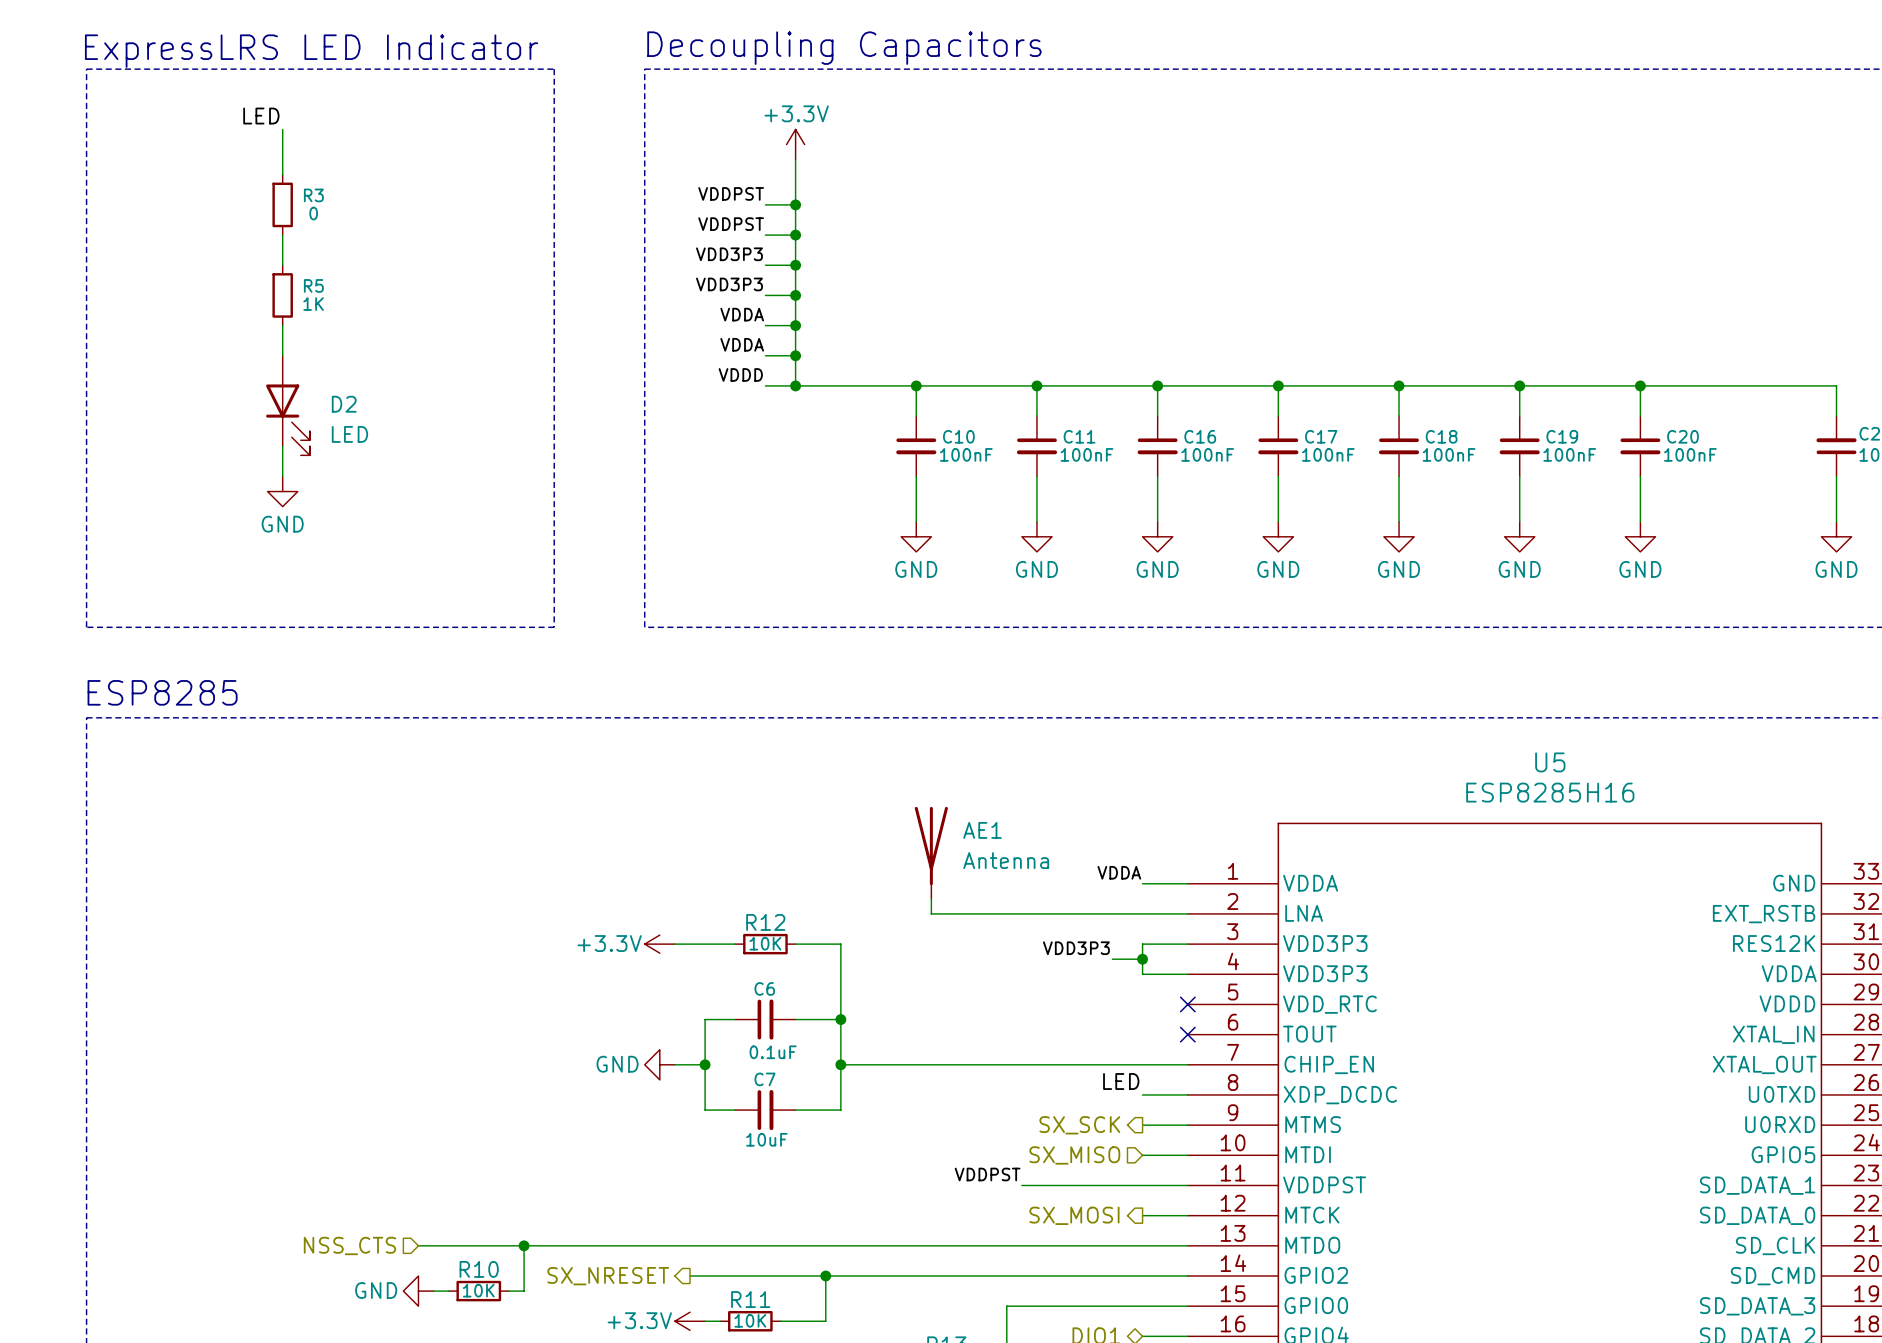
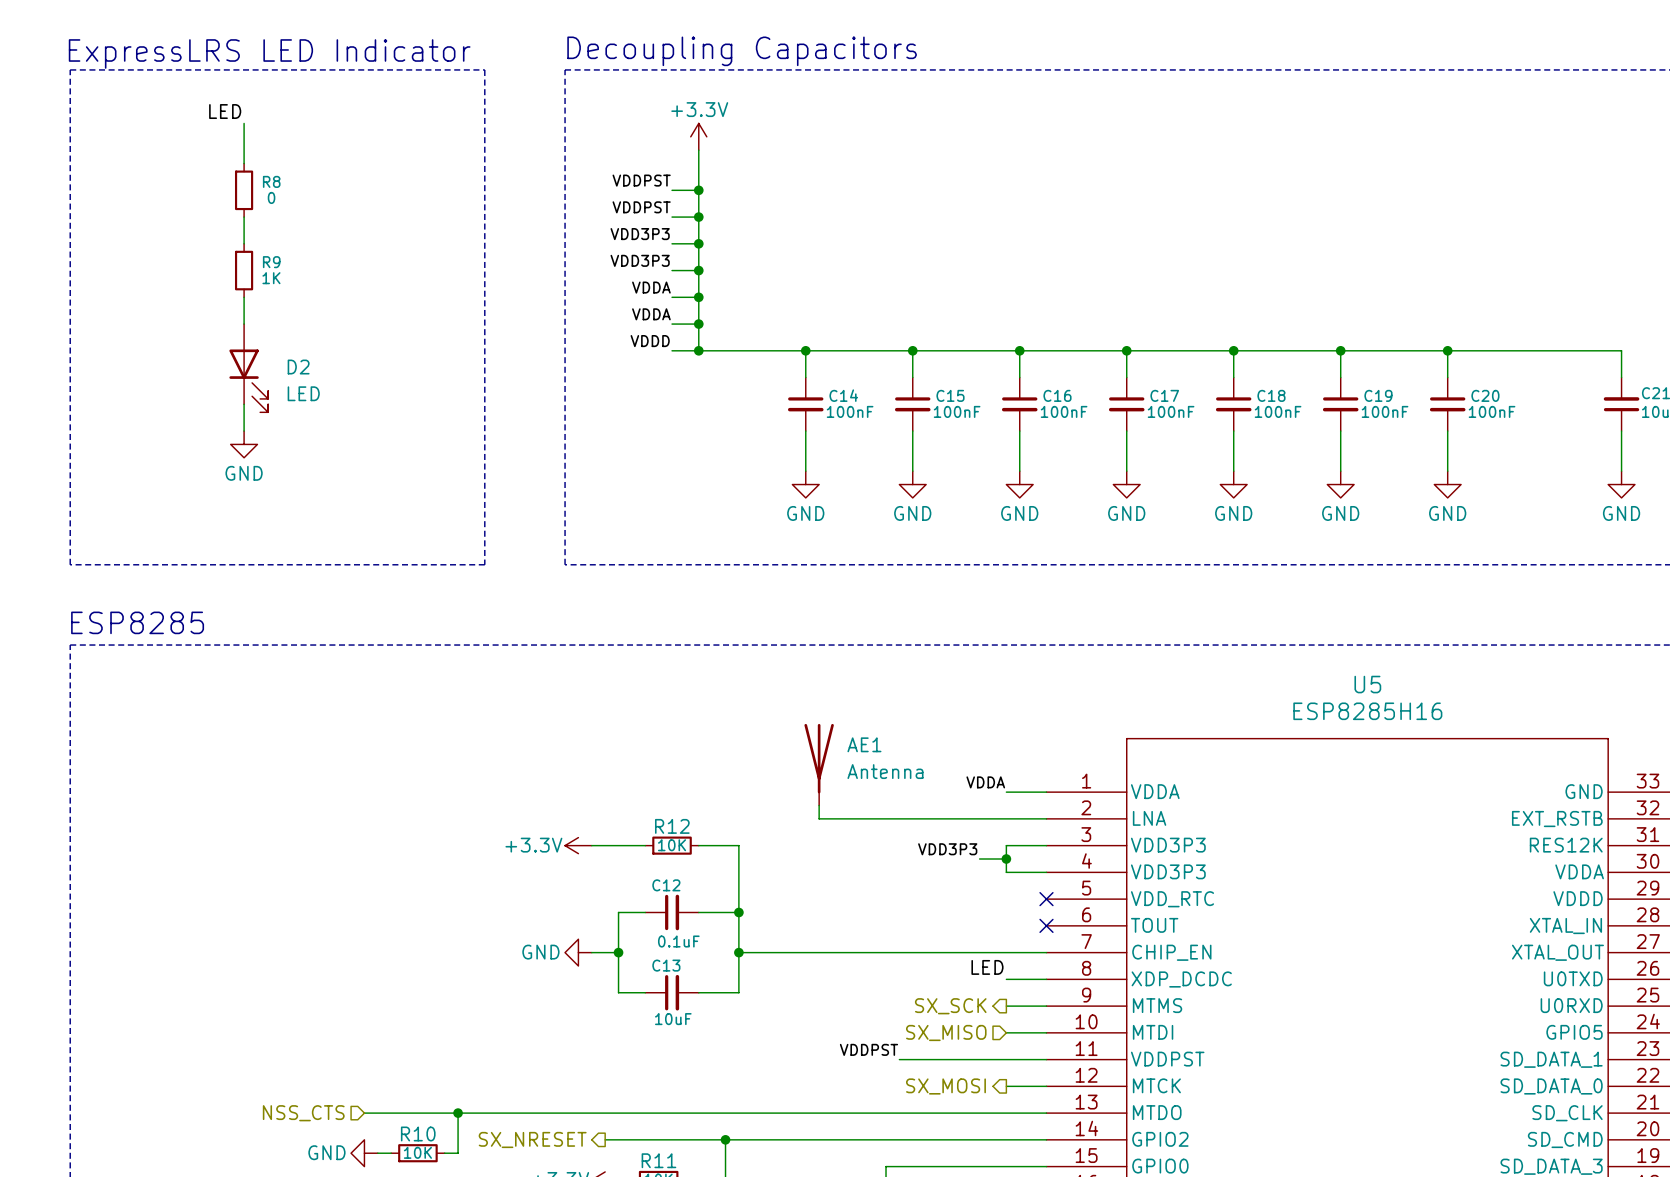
R3 name: R3 (313, 195) -> R8 (271, 181)
R5 name: R5 (313, 285) -> R9 (271, 262)
C10 name: C10 (958, 436) -> C14 (843, 395)
C11 name: C11 (1079, 436) -> C15 (950, 395)
C6 name: C6 (764, 988) -> C12 (666, 885)
C7 name: C7 (764, 1079) -> C13 (666, 965)

